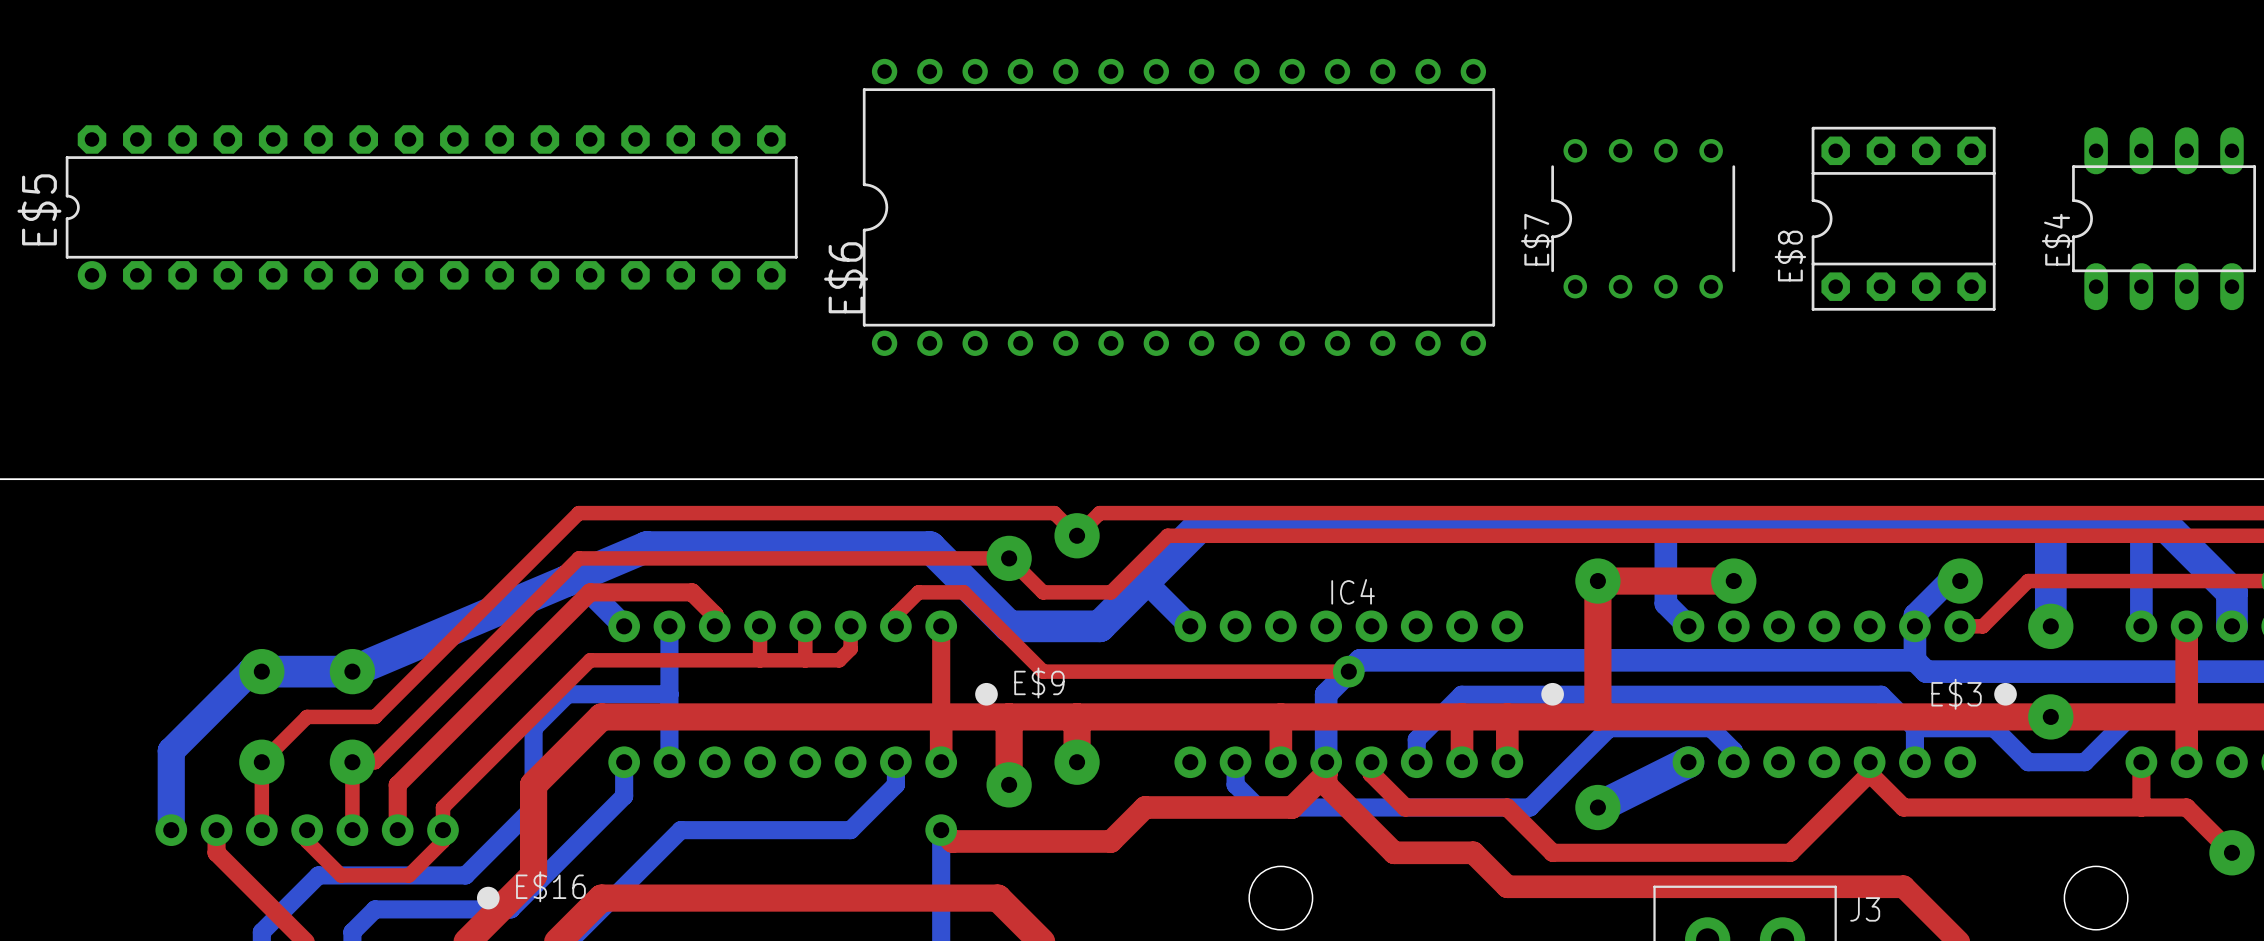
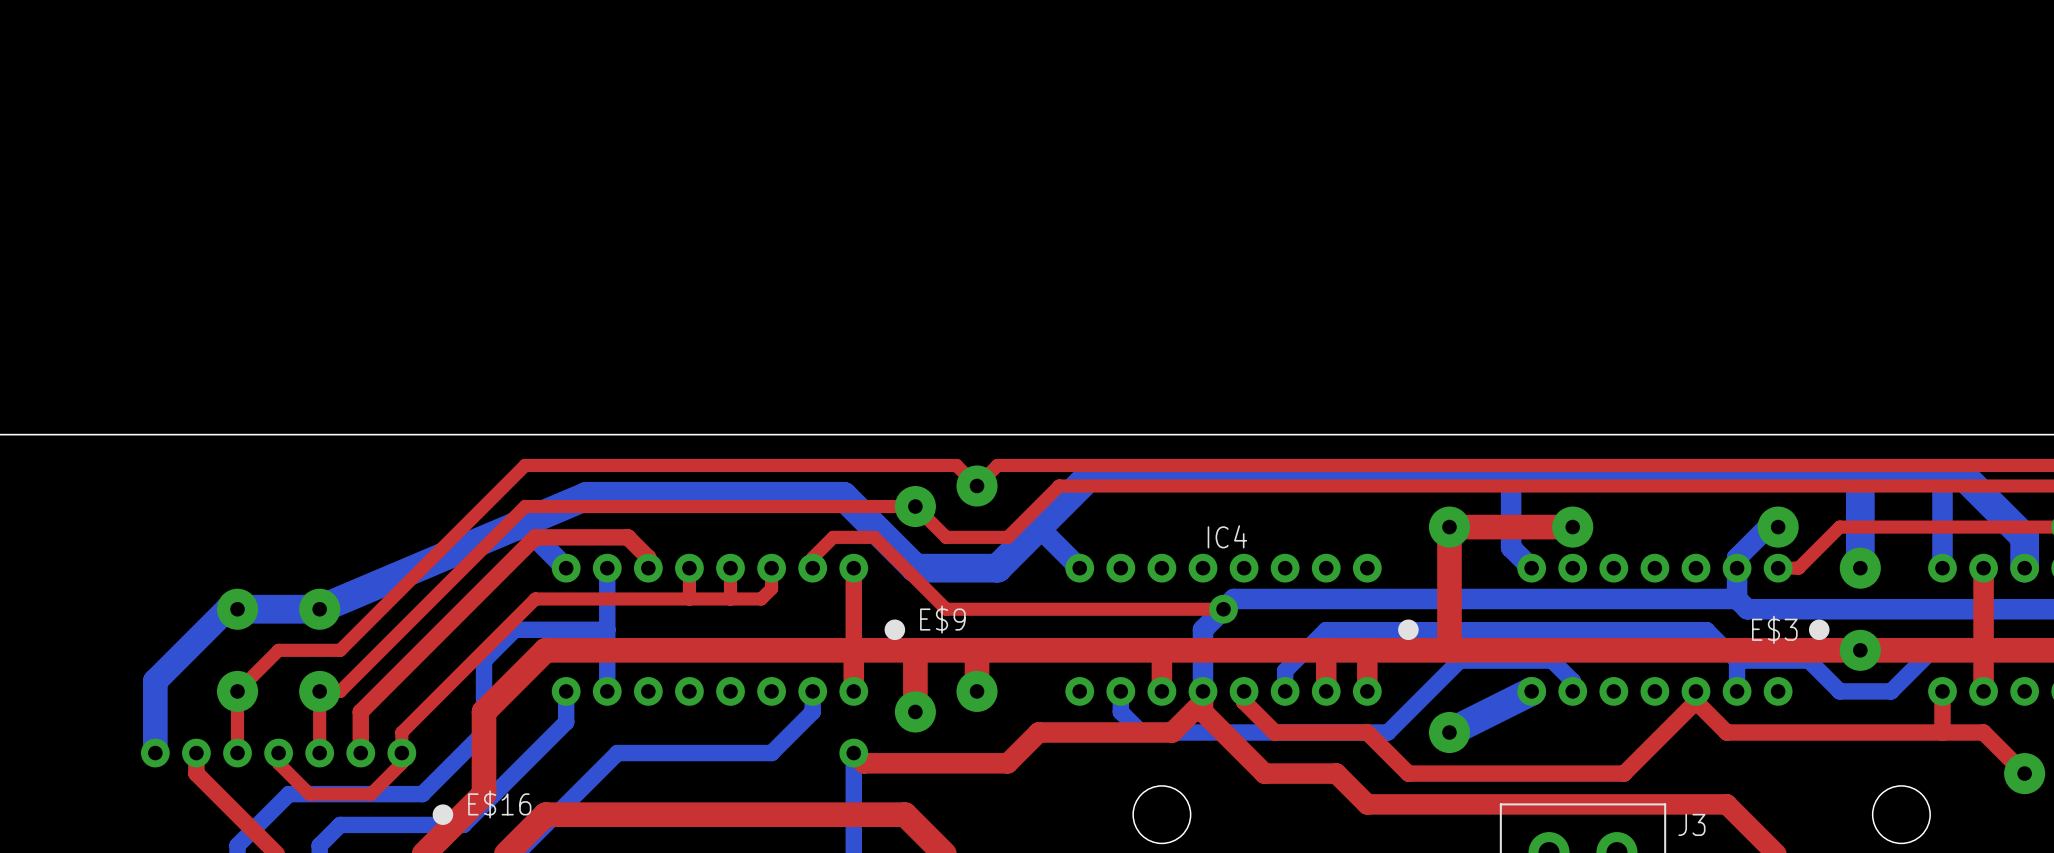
E$5: (431, 207) -> none
E$6: (1178, 207) -> none
E$7: (1643, 218) -> none
E$8: (1903, 218) -> none
E$4: (2164, 218) -> none

